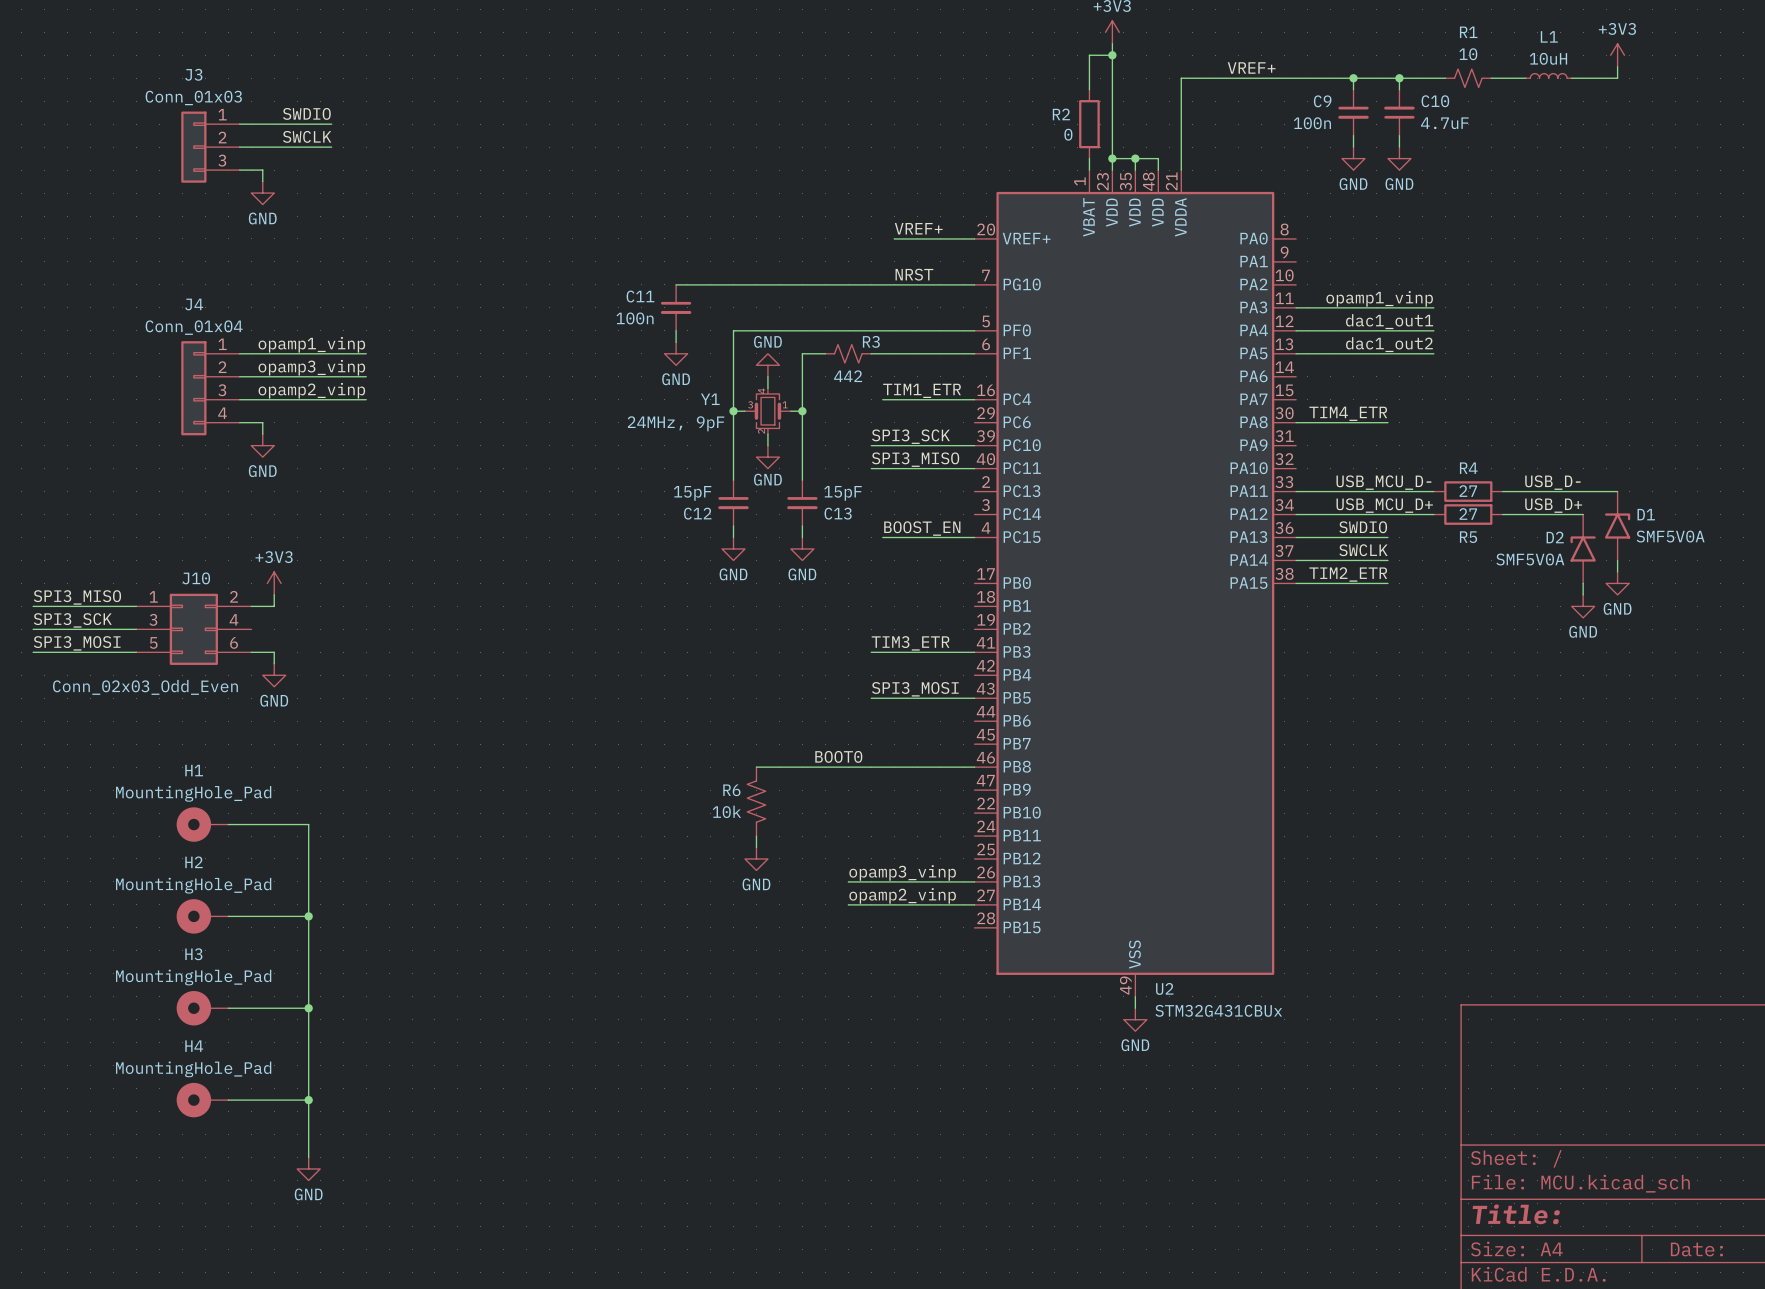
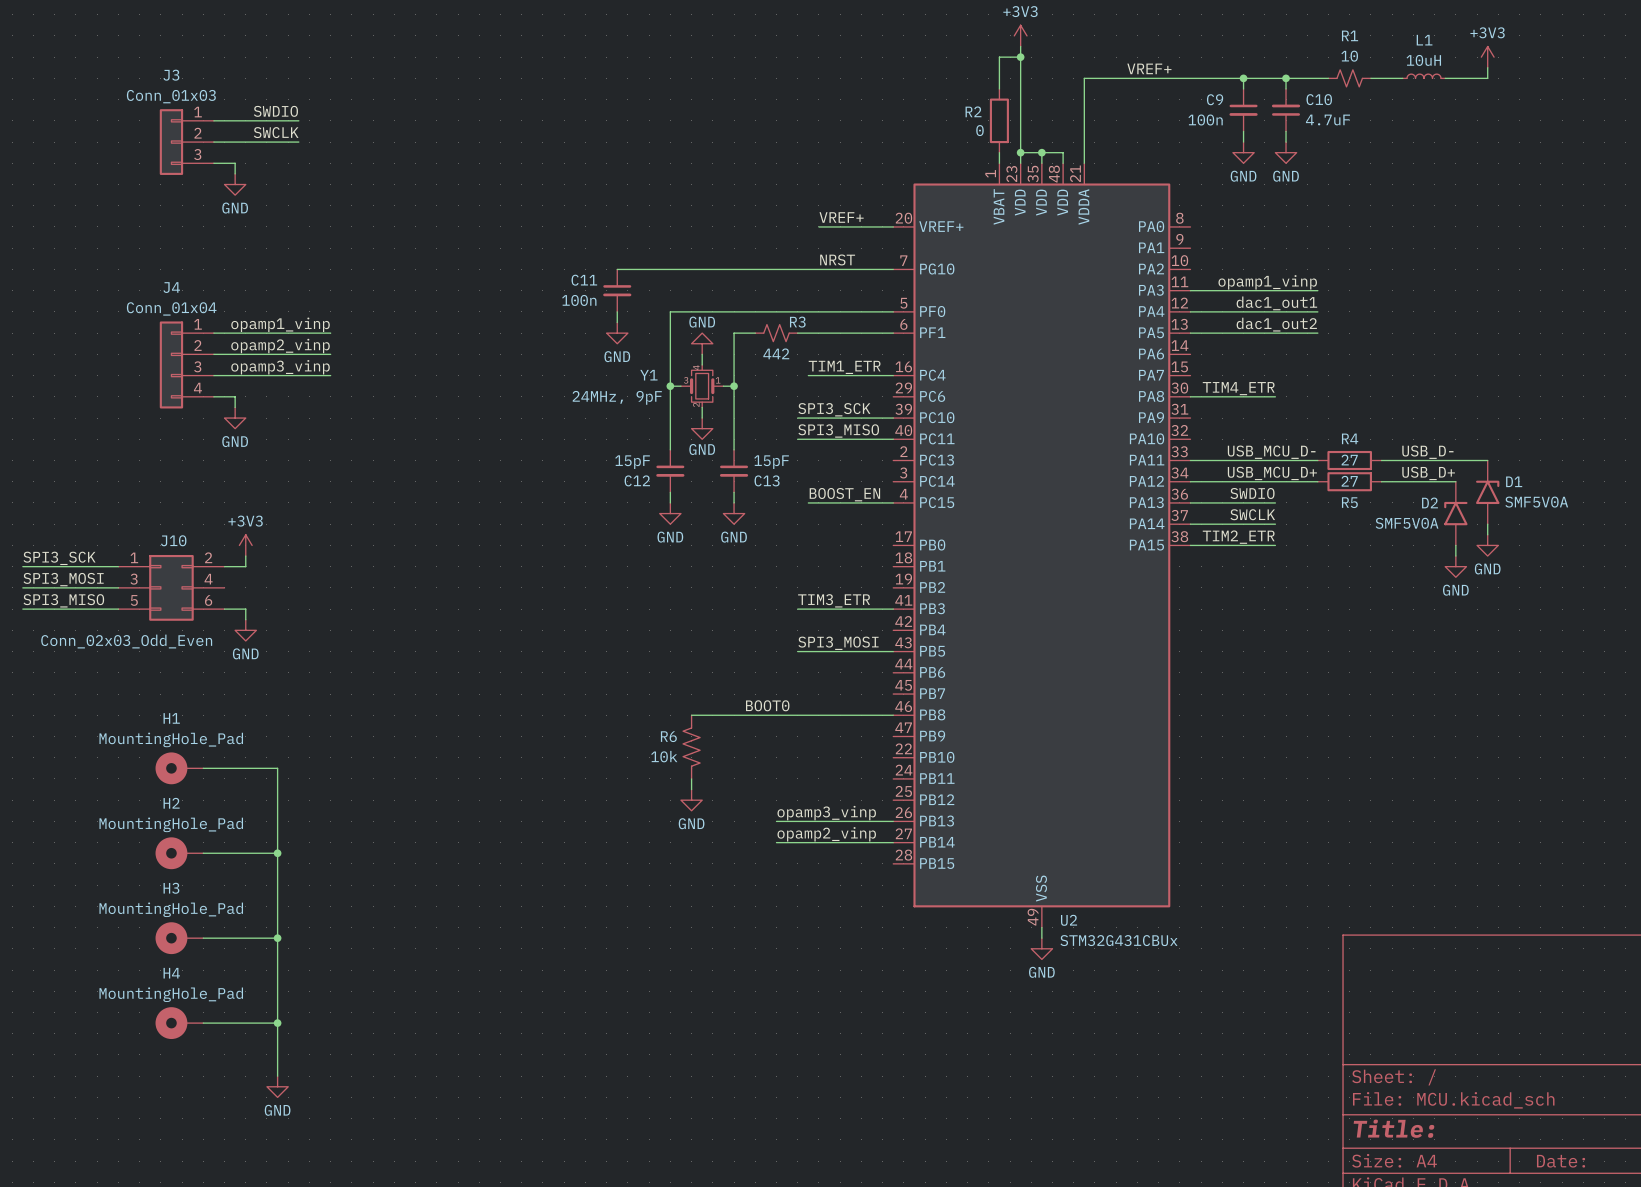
label: opamp3_vinp (311, 367) -> opamp2_vinp (280, 346)
label: opamp2_vinp (311, 390) -> opamp3_vinp (280, 367)
label: SPI3_MISO (77, 597) -> SPI3_SCK (59, 558)
label: SPI3_SCK (72, 620) -> SPI3_MOSI (63, 579)
label: SPI3_MOSI (77, 643) -> SPI3_MISO (63, 600)

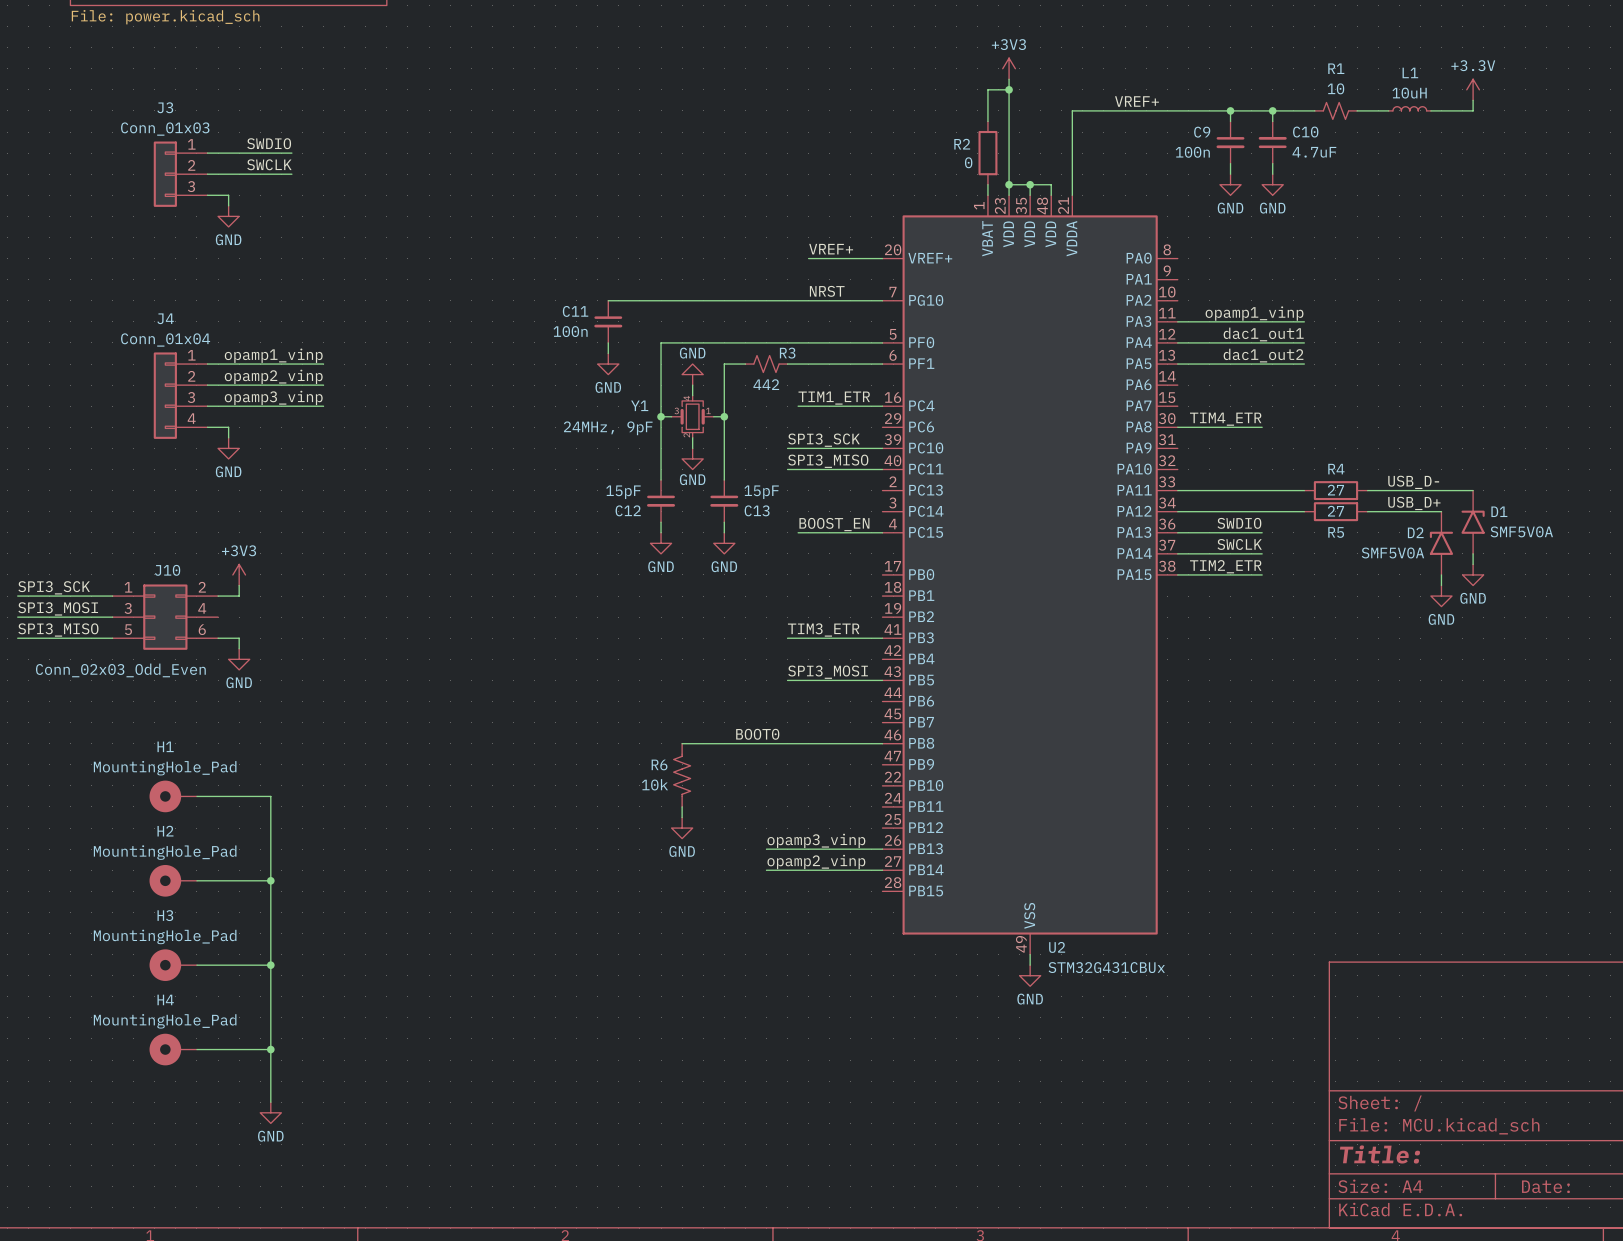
power symbol: +3V3 (1487, 57) -> +3.3V (1473, 89)
label: USB_MCU_D- (1271, 452) -> none
label: USB_MCU_D+ (1272, 473) -> none

